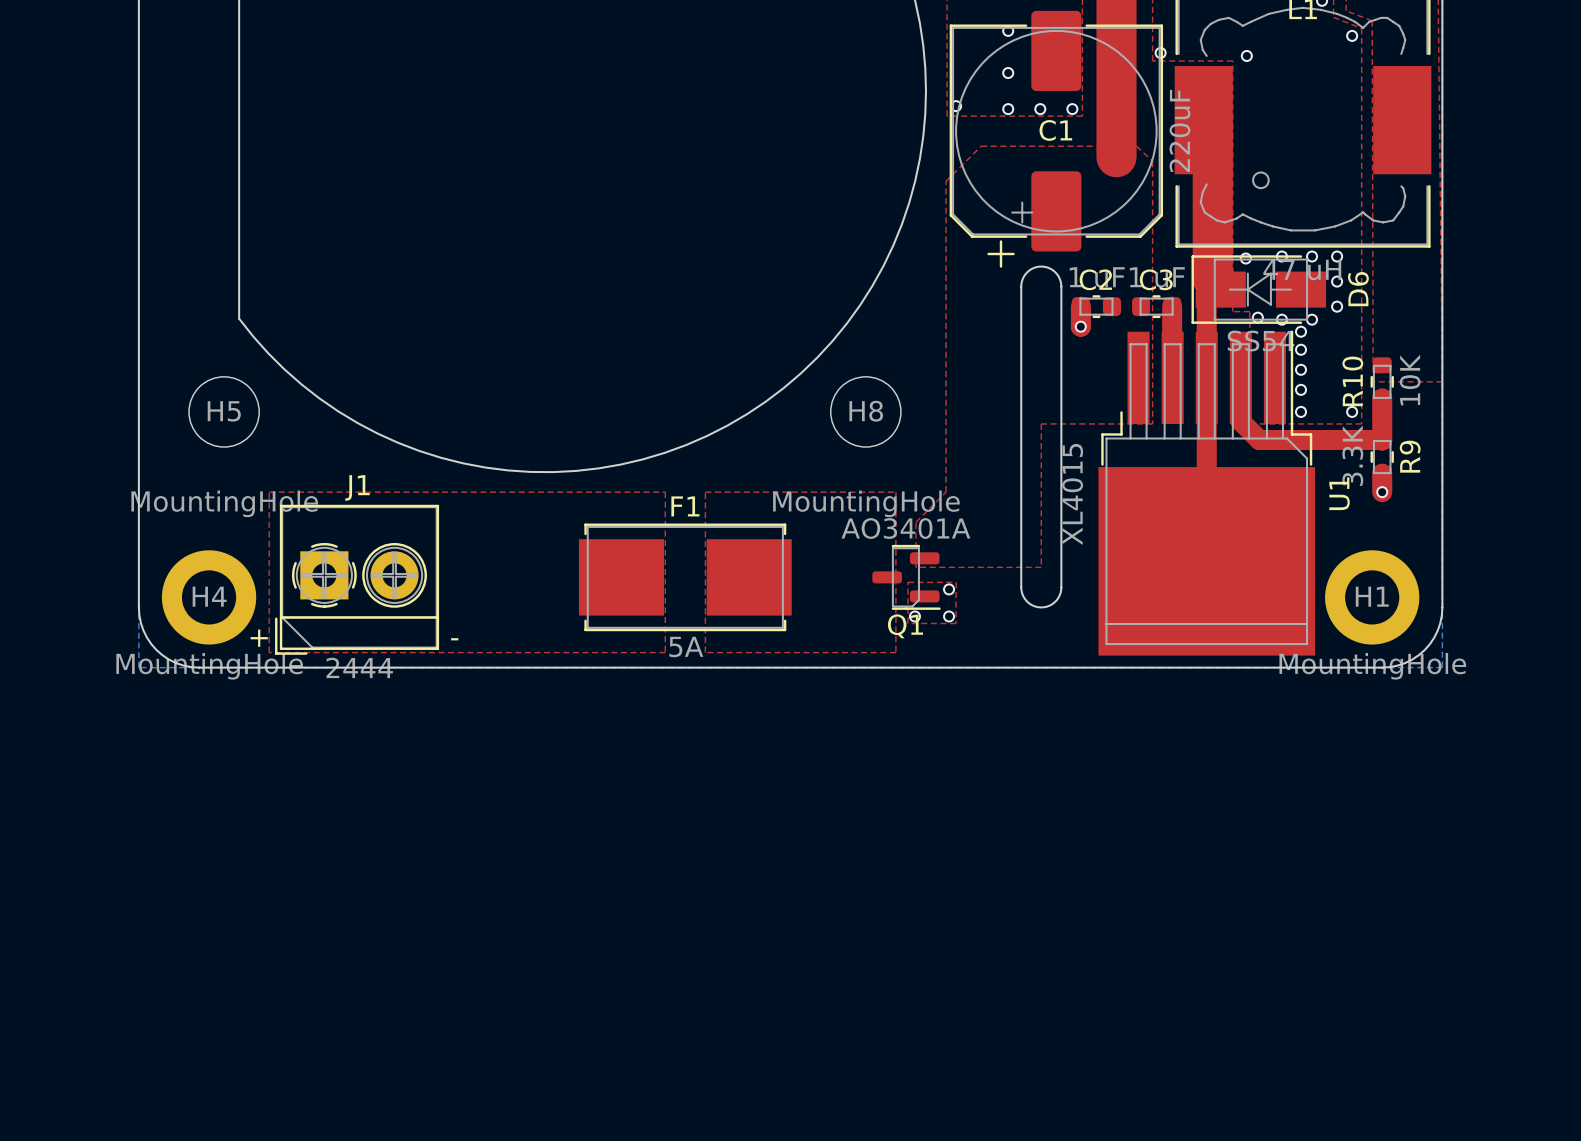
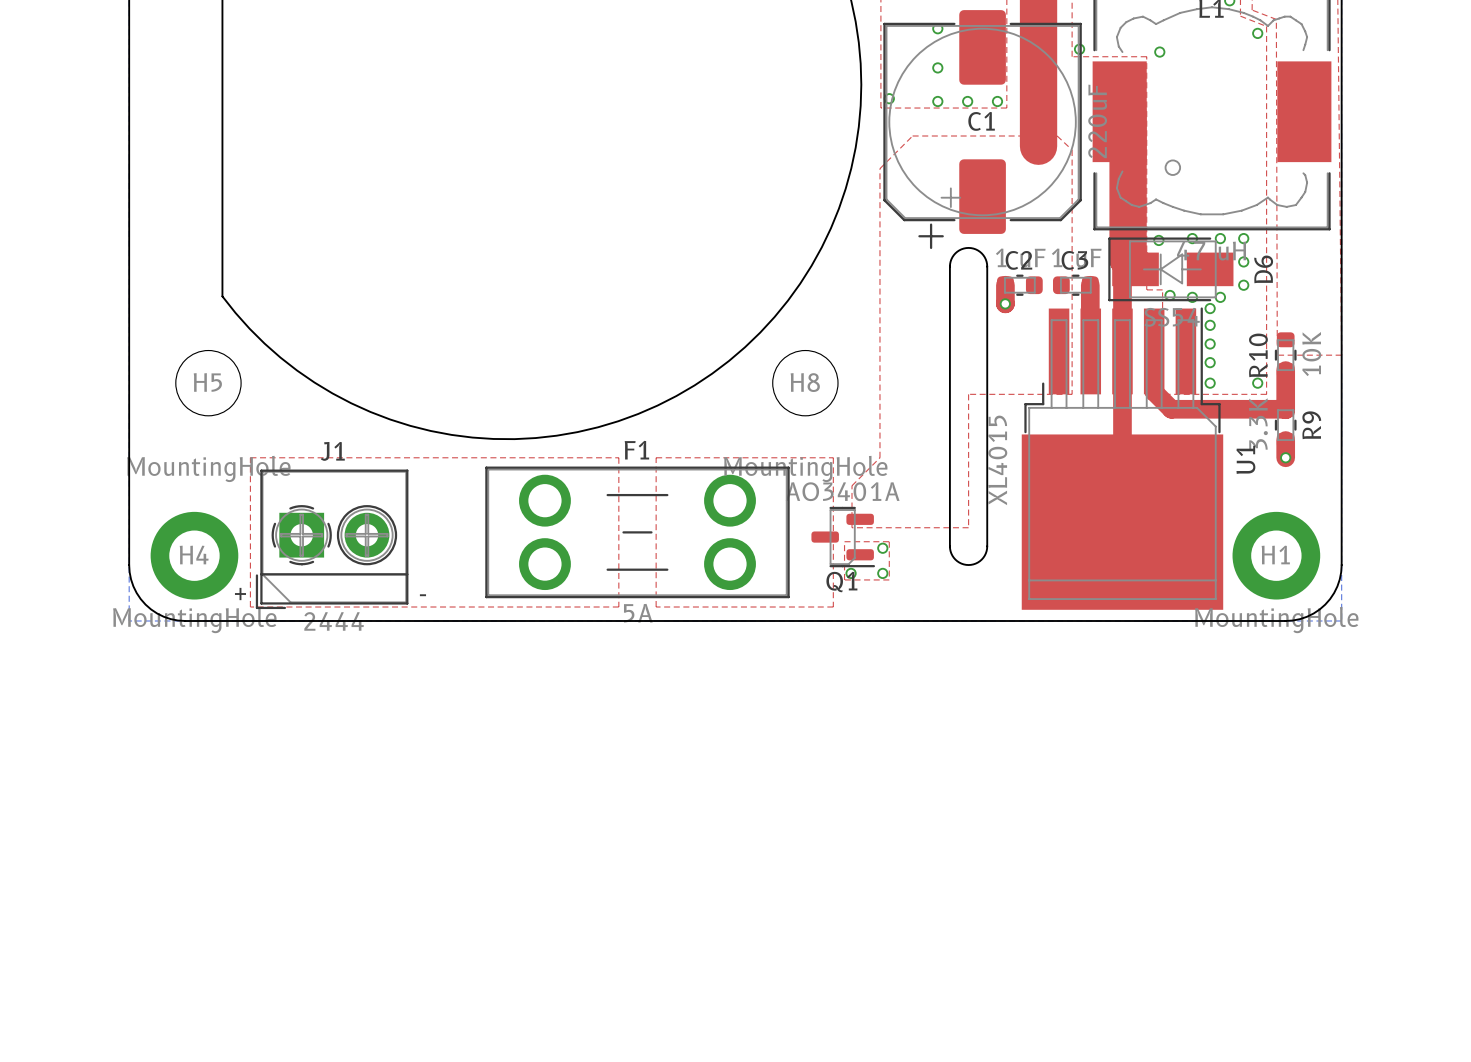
F1 footprint: [578, 523, 792, 632] -> [485, 466, 790, 599]

